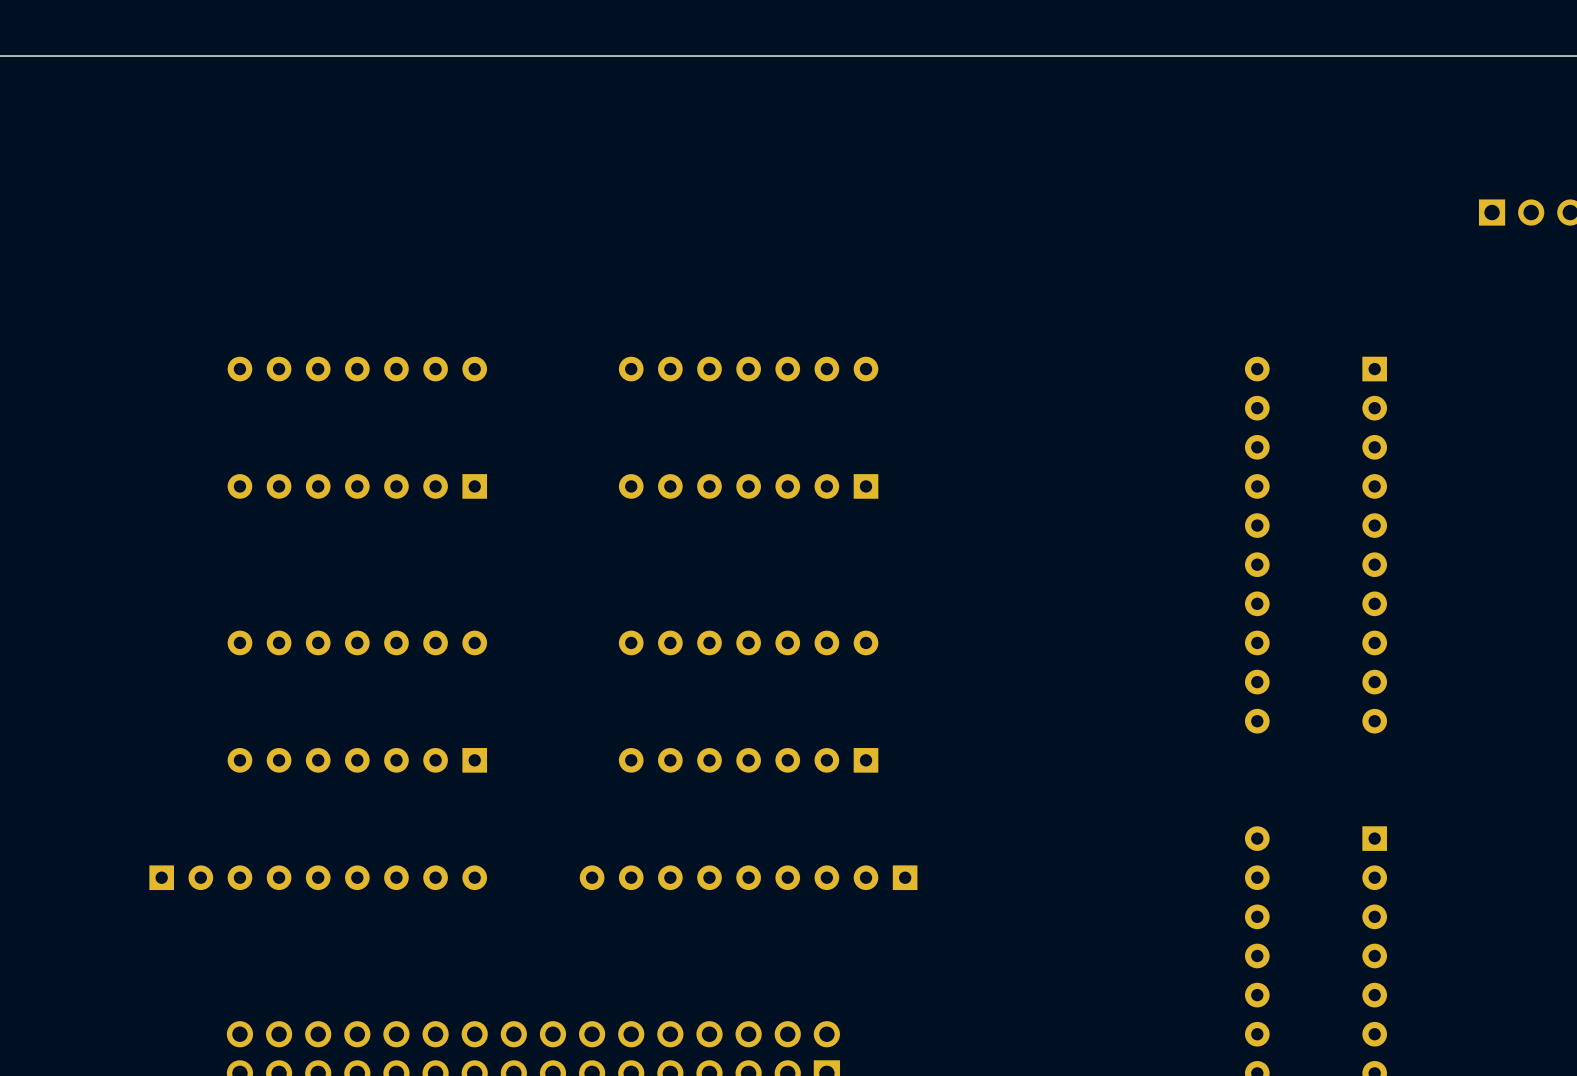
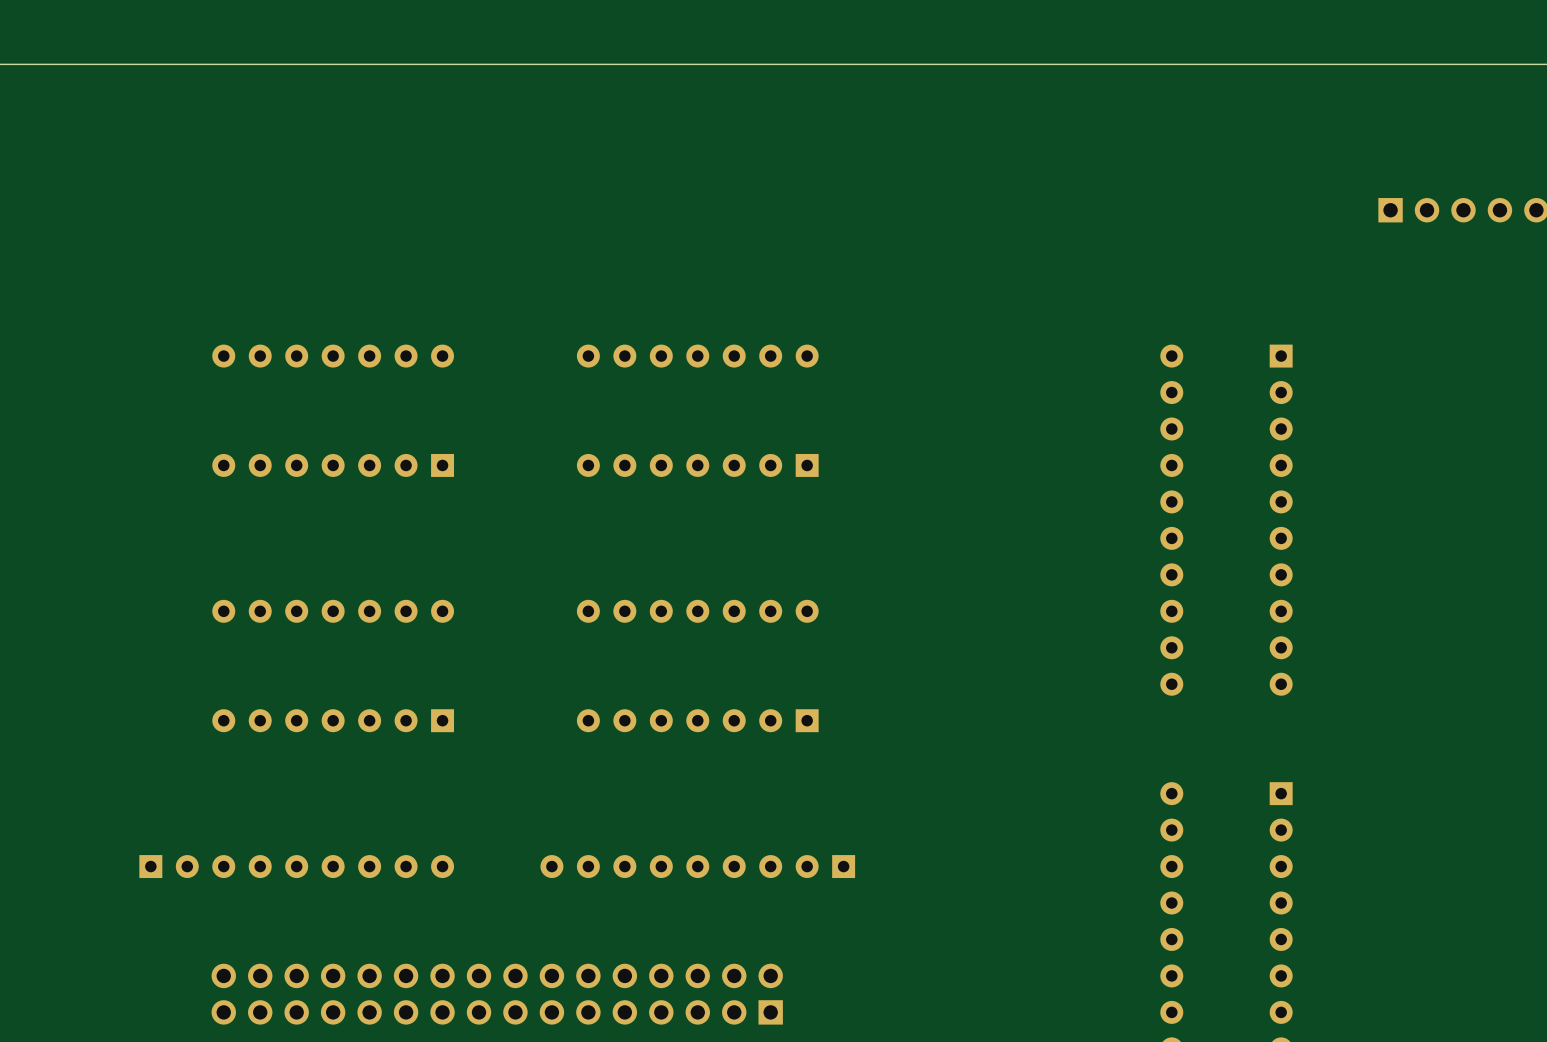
part position: (318, 877) -> (296, 866)
part position: (748, 877) -> (697, 866)

